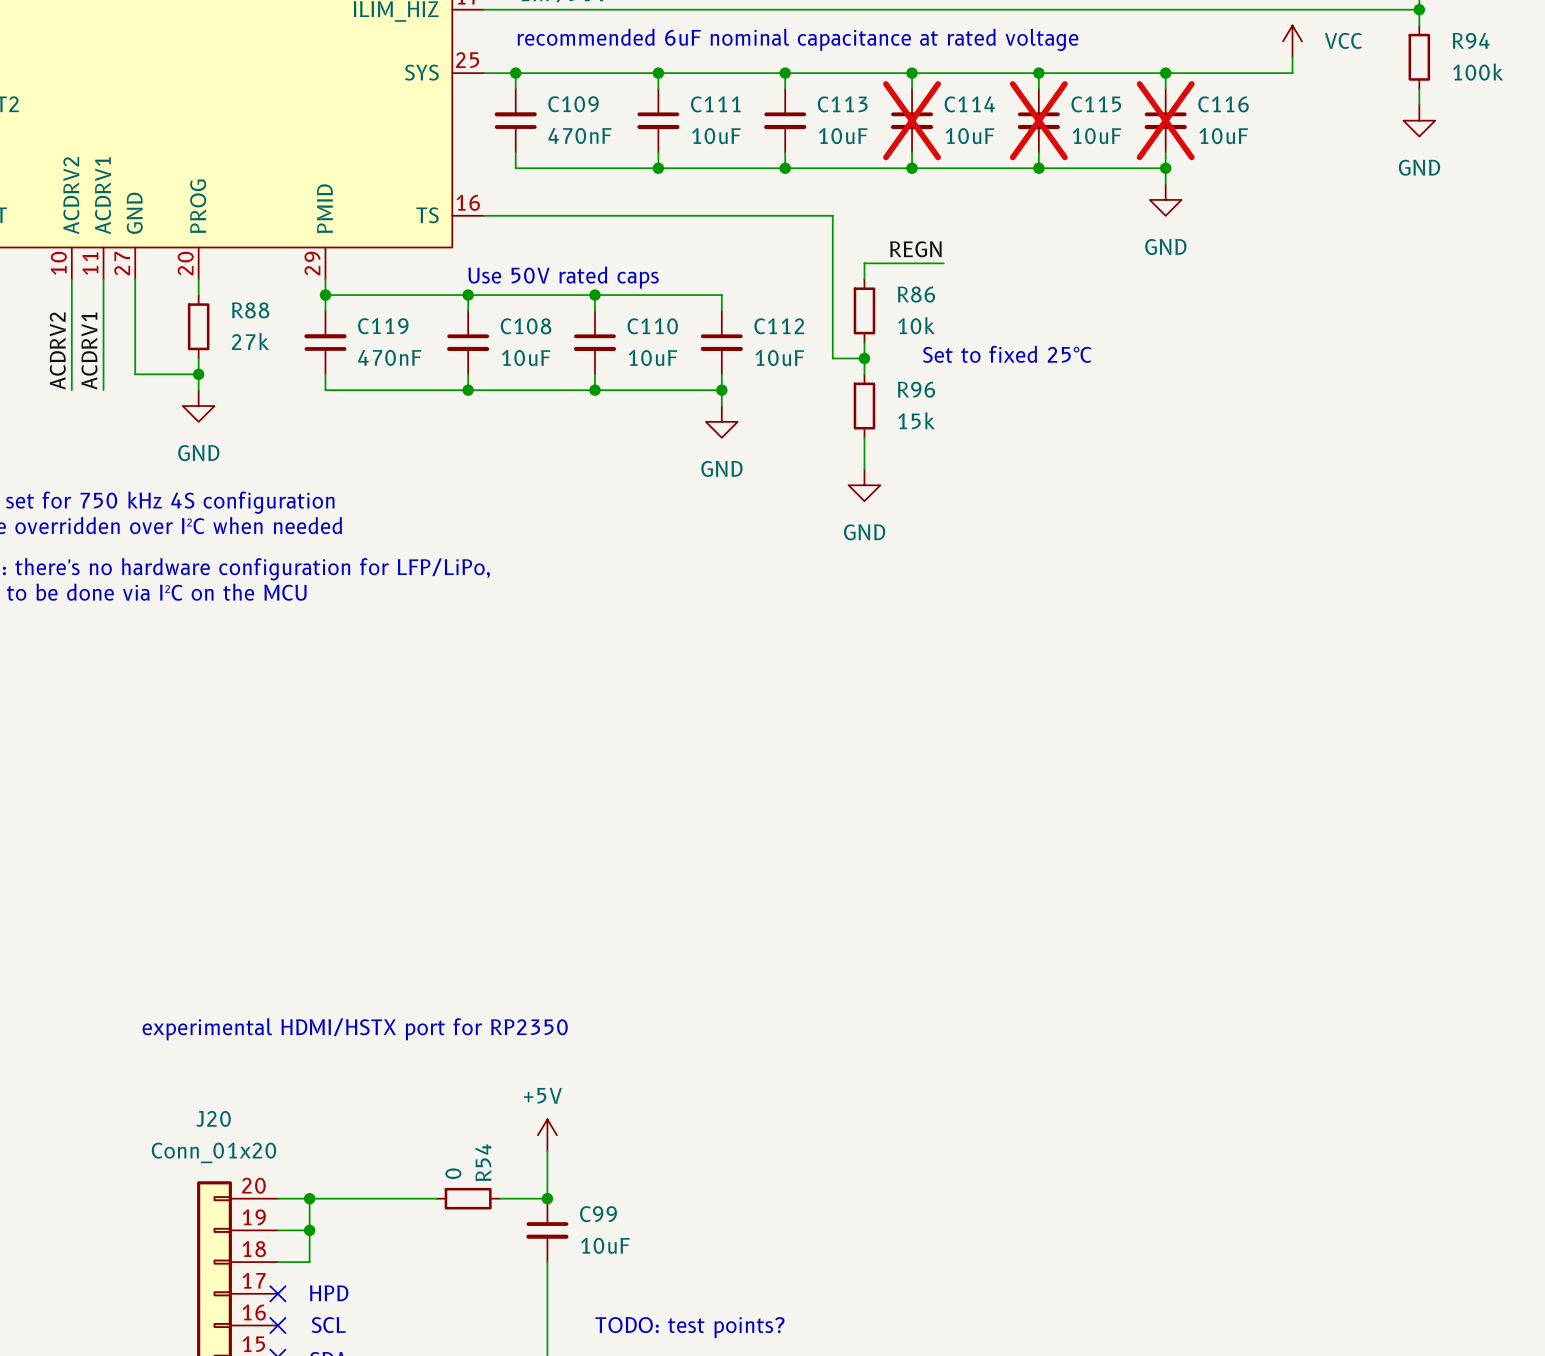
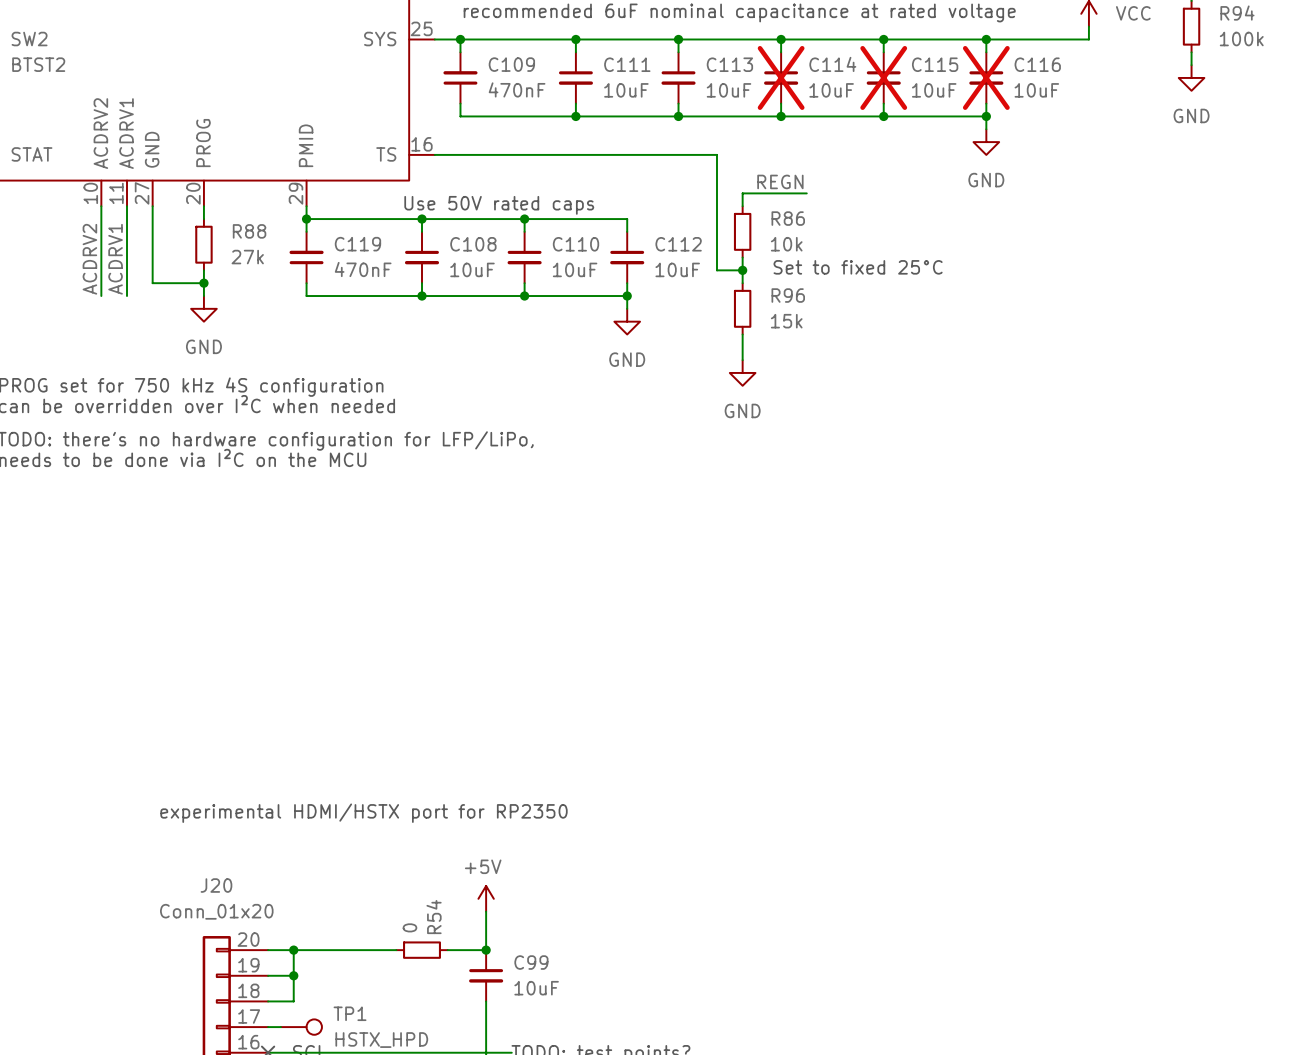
wire: none -> (268, 1027) (280, 1027)
no-connect mark: (277, 1293) -> none
TP1: none -> HSTX_HPD (301, 1027)
text: HPD (329, 1293) -> none
wire: none -> (268, 1052) (511, 1052)

